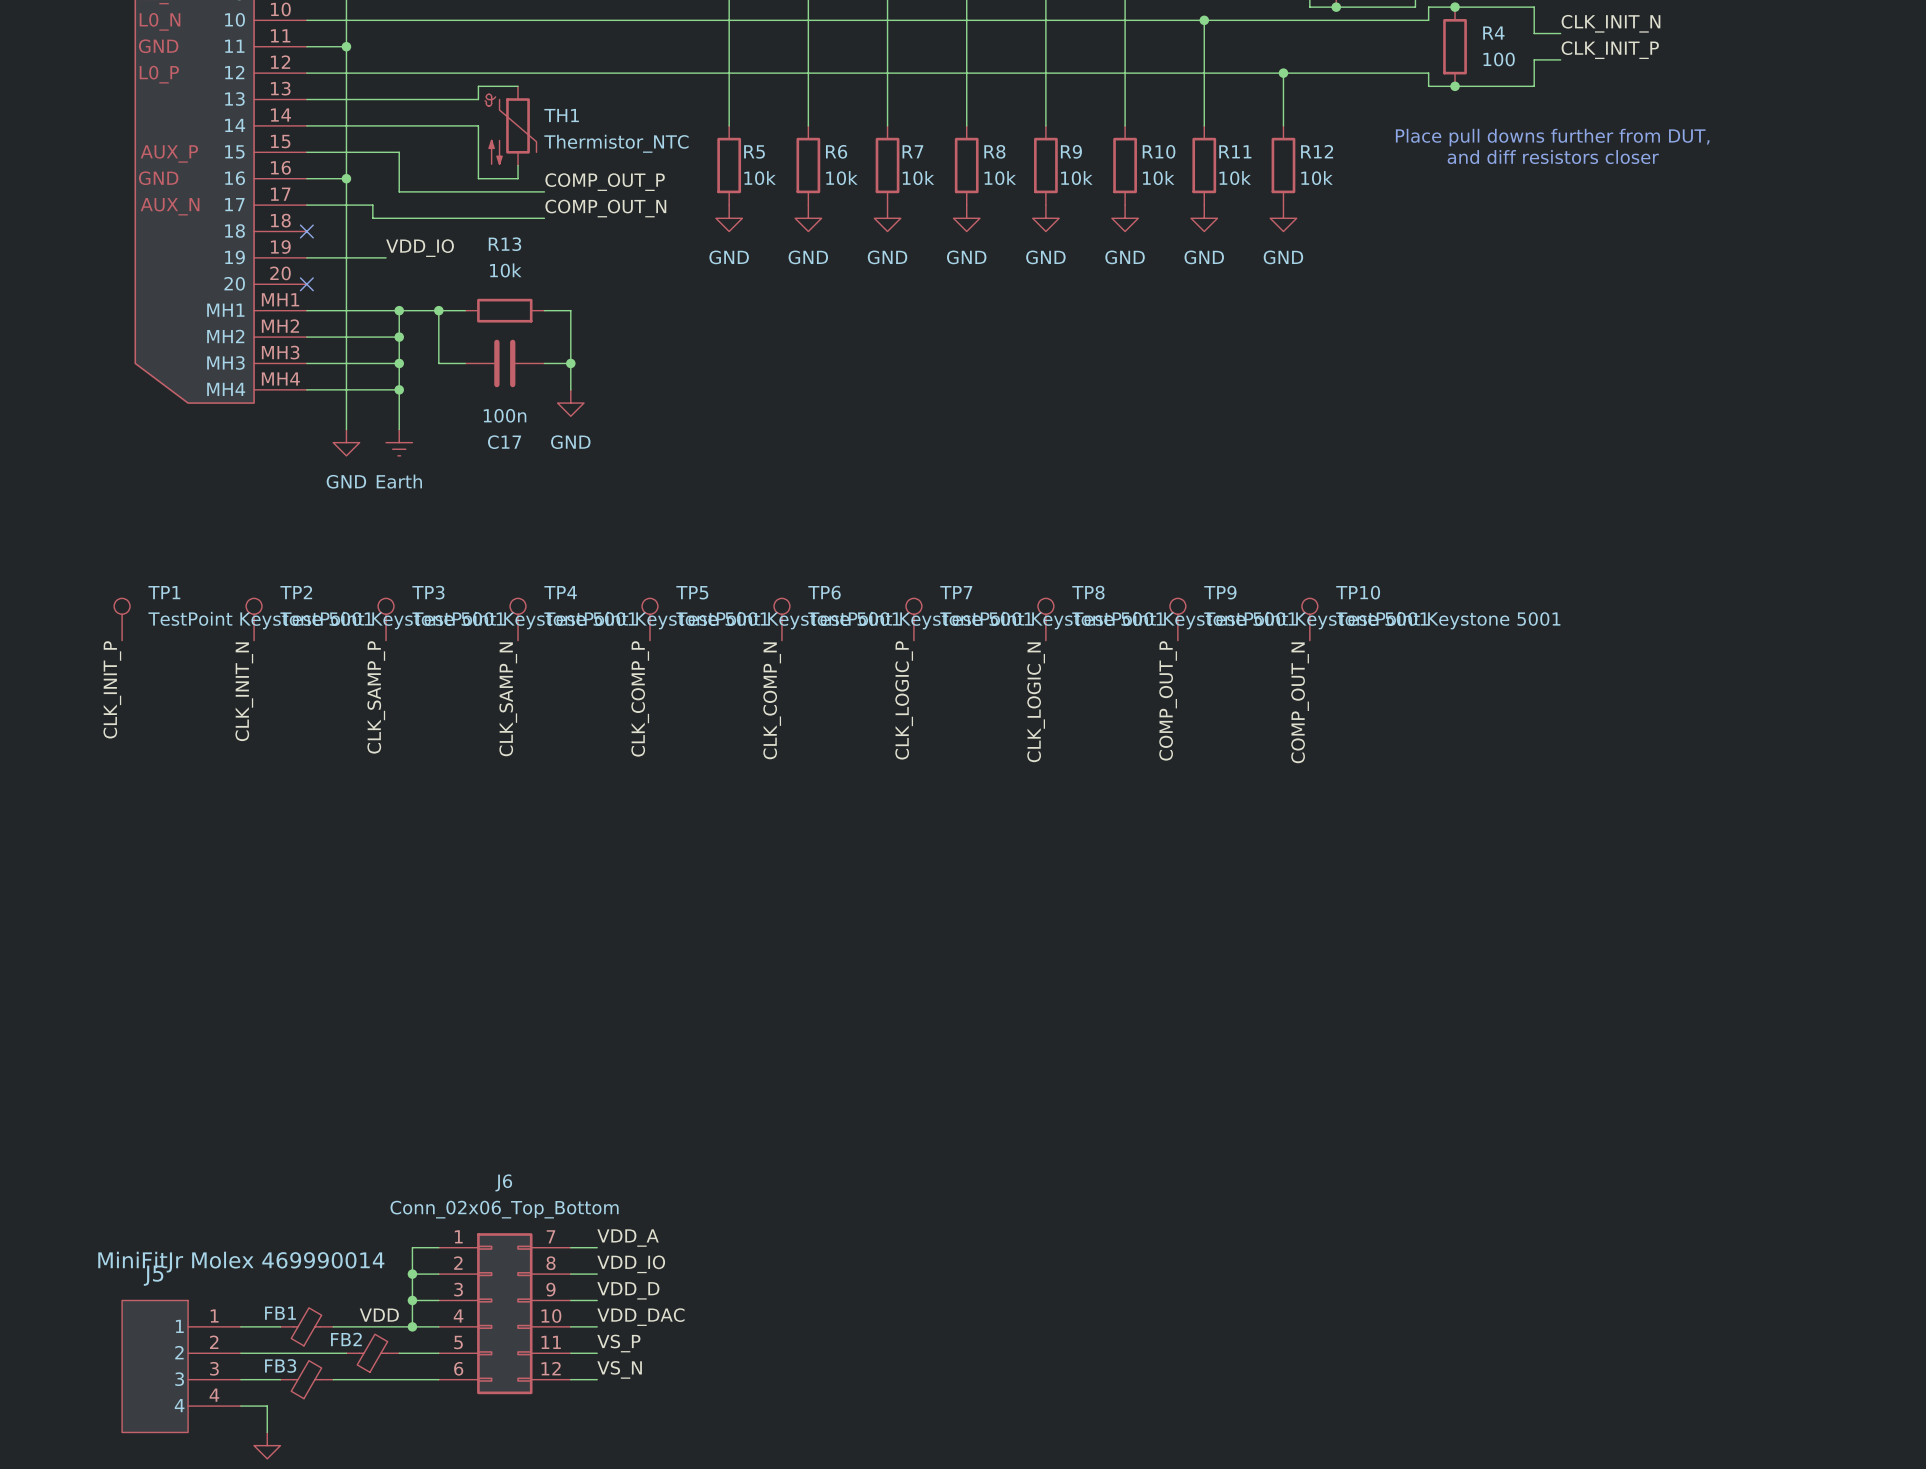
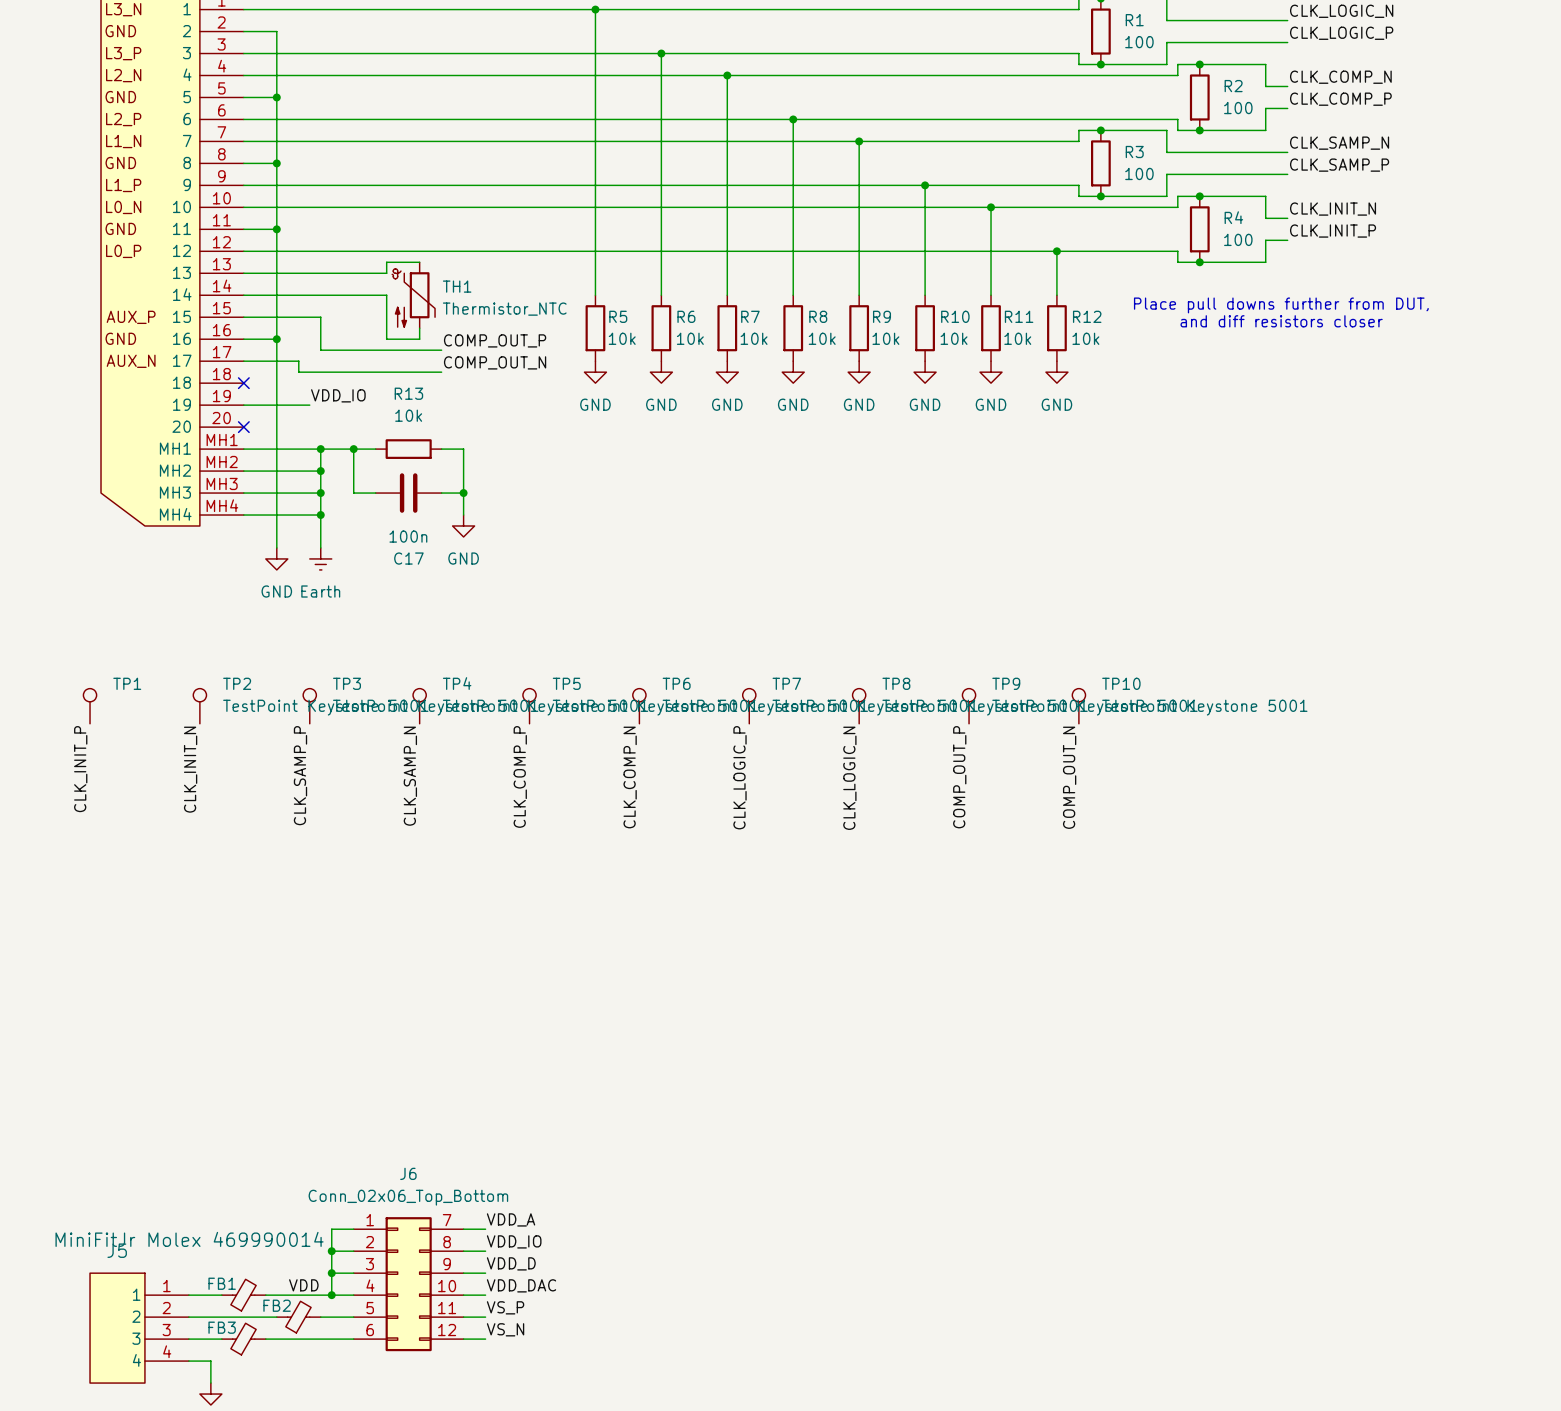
TP1 value: TestPoint Keystone 5001 (260, 620) -> none

